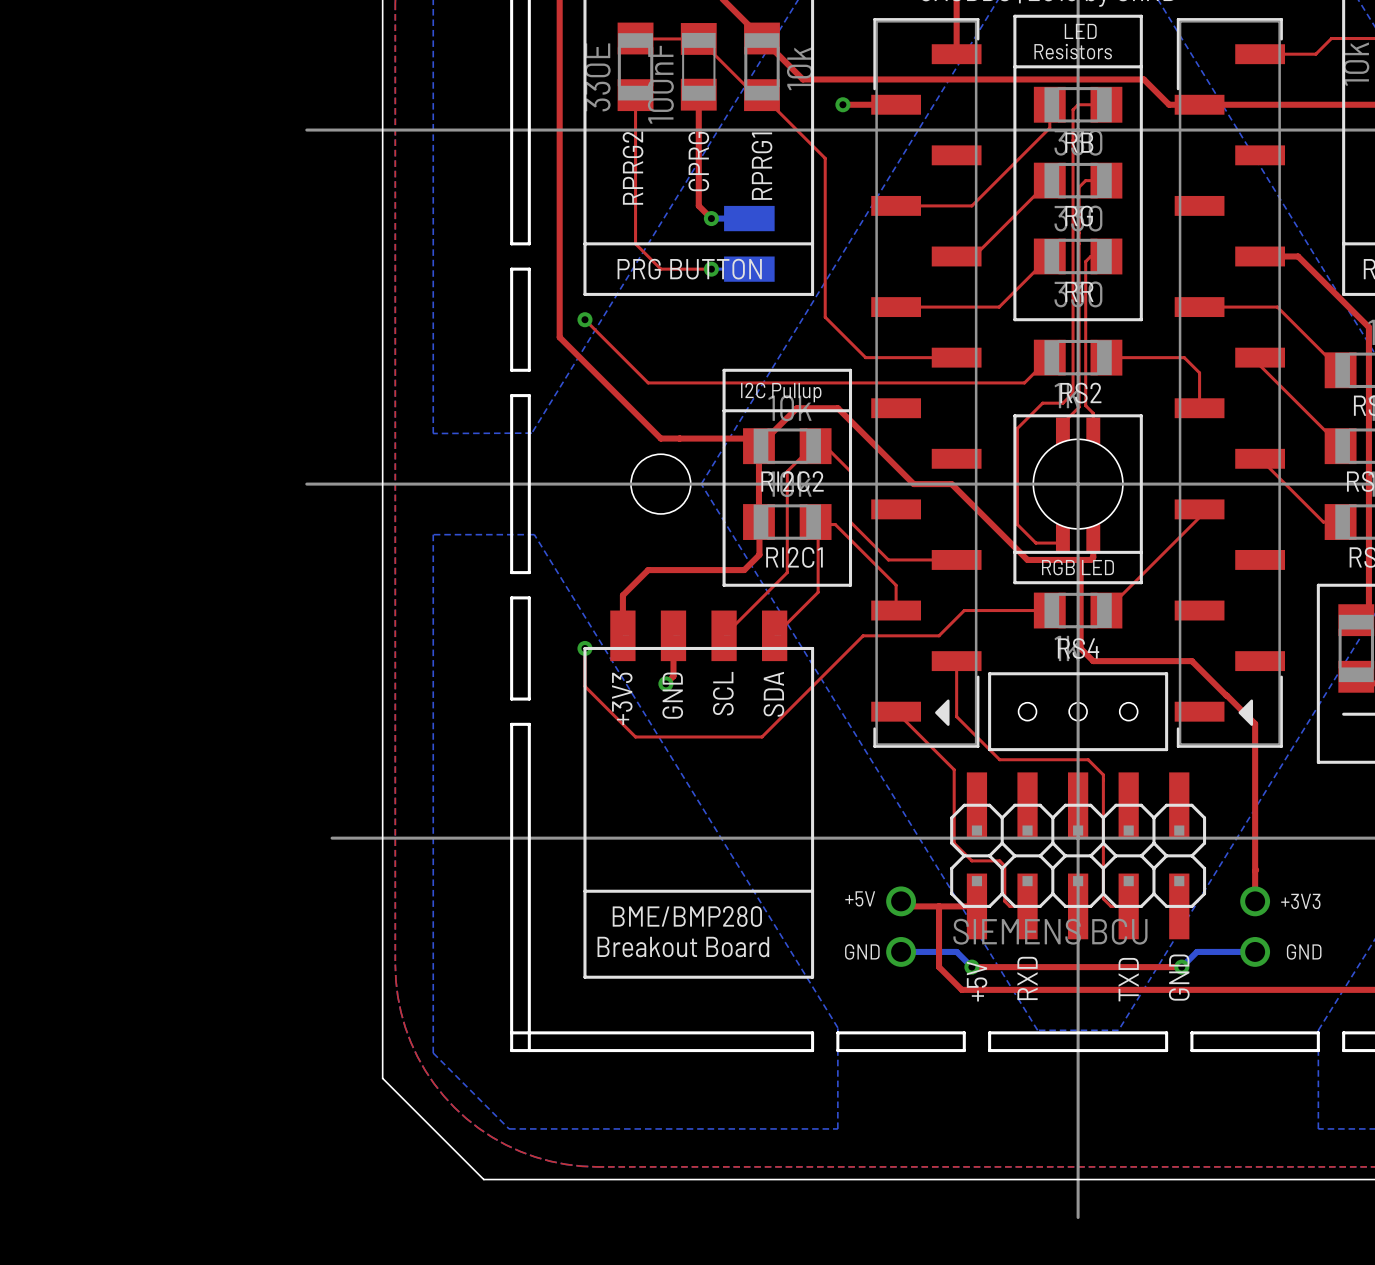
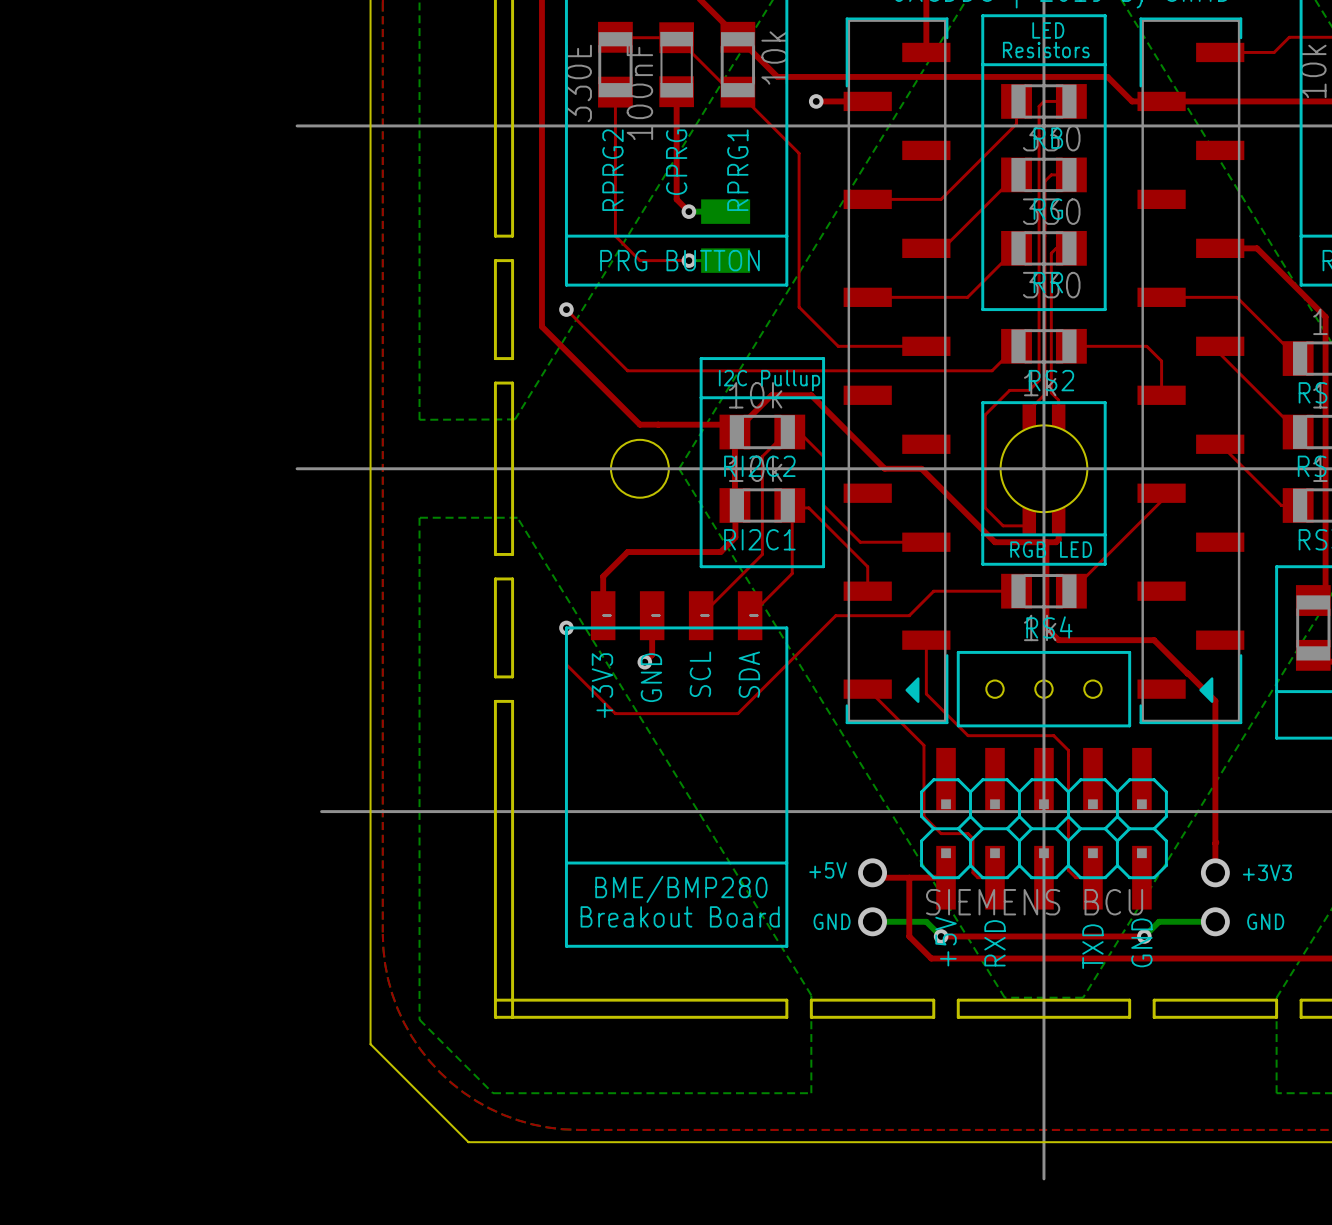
line: none -> (1276, 691) (1301, 691)

